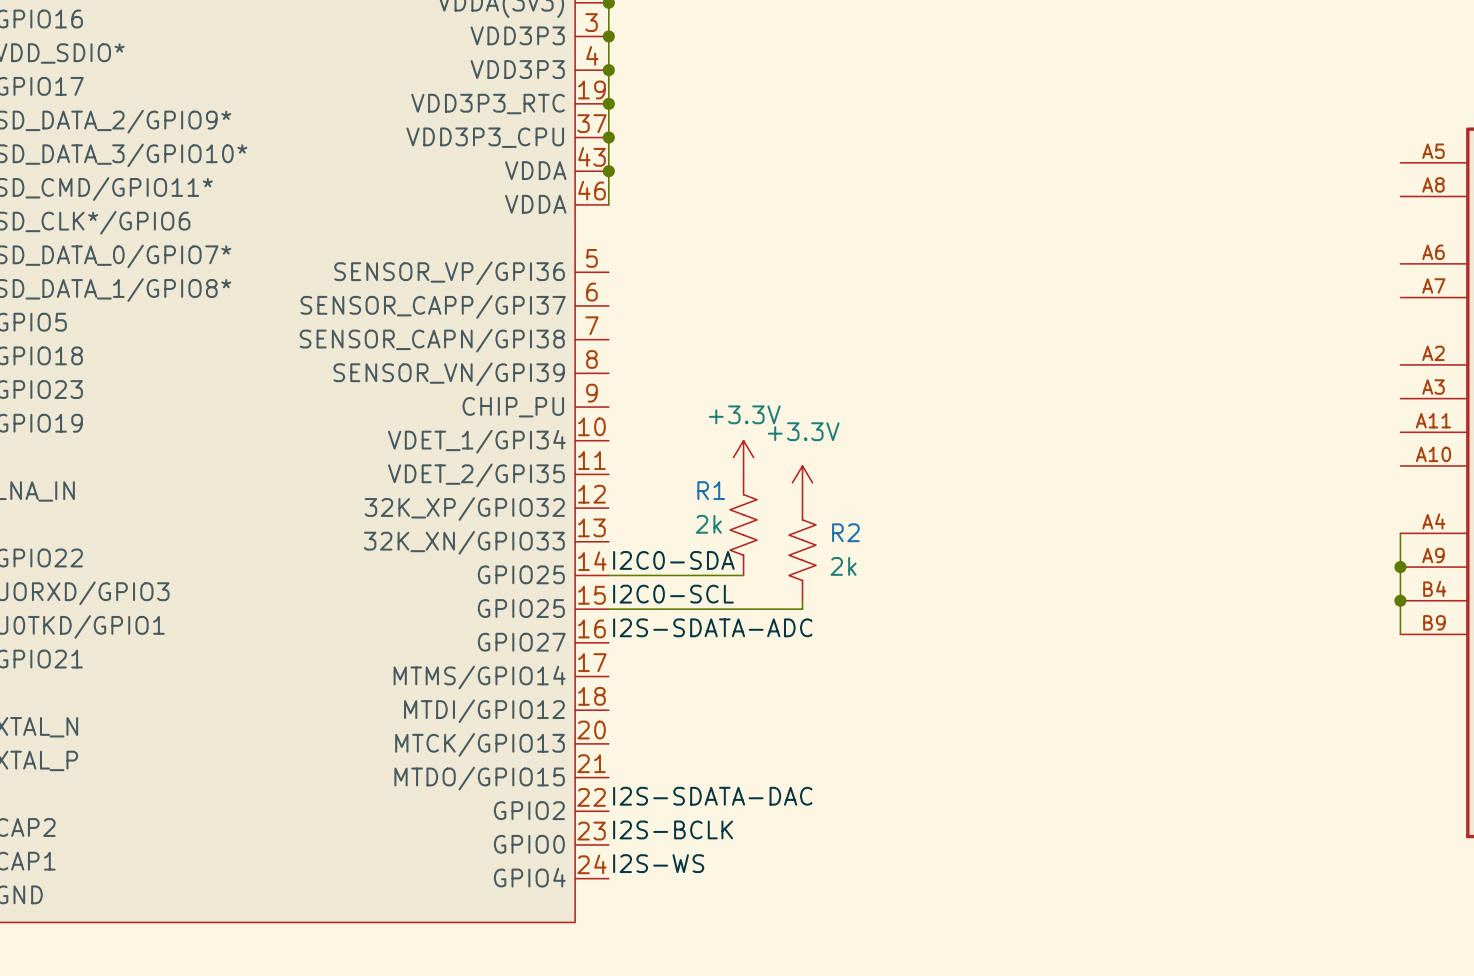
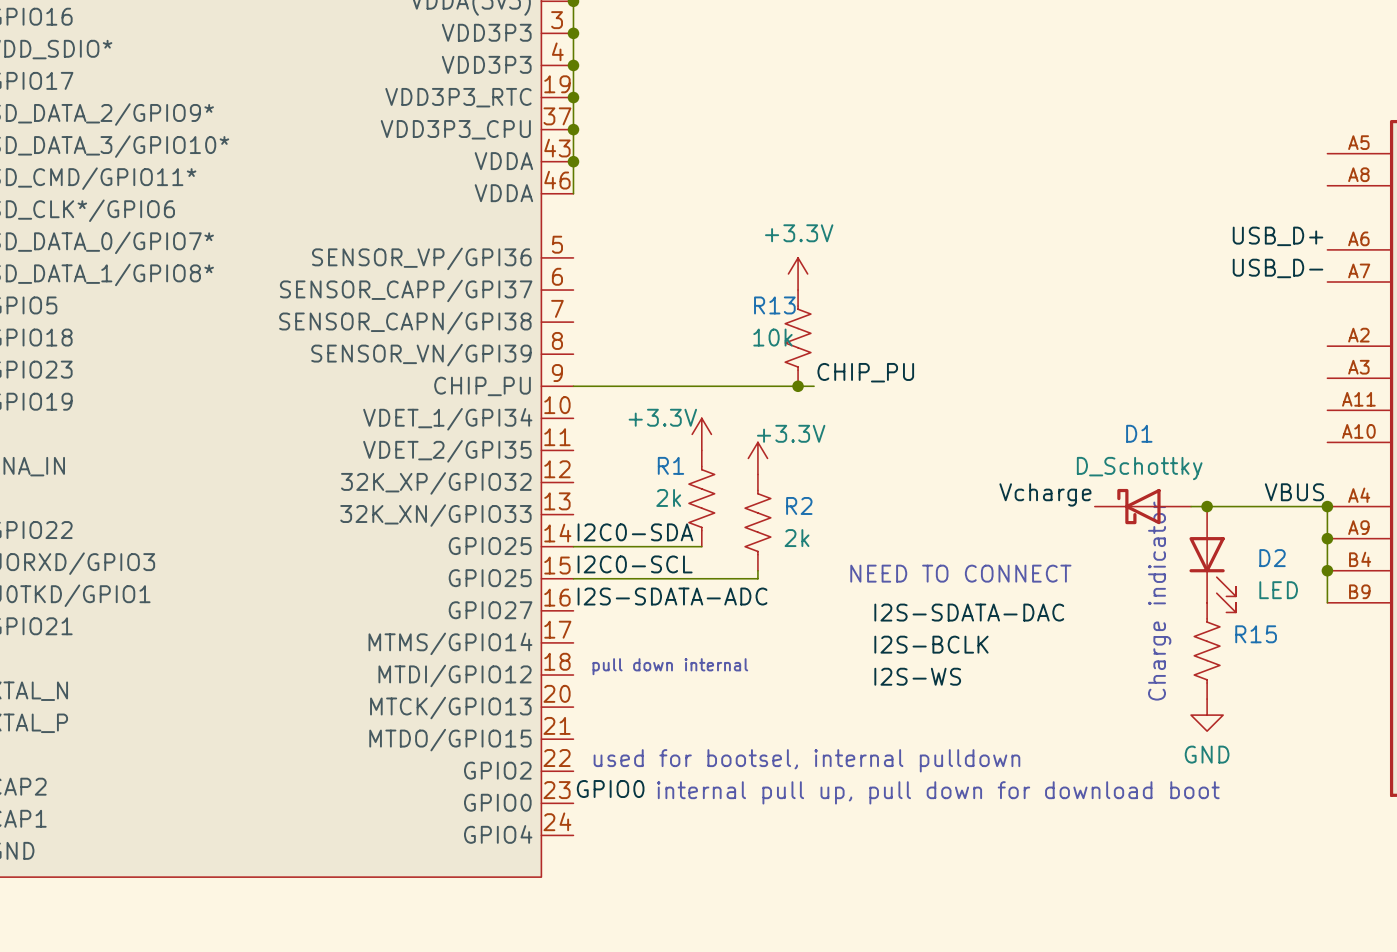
label: none -> USB_D+ (1278, 236)
label: none -> USB_D- (1278, 268)
power symbol: none -> +3.3V (798, 273)
R13: none -> 10k (798, 338)
label: none -> CHIP_PU (865, 372)
wire: none -> (573, 386) (814, 386)
junction: none -> (798, 386)
power symbol text position: +3.3V (744, 414) -> +3.3V (662, 417)
power symbol text position: +3.3V (803, 431) -> +3.3V (791, 433)
label: none -> VBUS (1294, 492)
label: none -> Vcharge (1045, 494)
D1: none -> D_Schottky (1142, 506)
wire: none -> (1191, 506) (1327, 506)
junction: none -> (1207, 506)
junction: none -> (1327, 506)
D2: none -> LED (1212, 559)
text: none -> NEED TO CONNECT (960, 573)
text: none -> Charge indicator (1159, 601)
label: none -> I2S-SDATA-DAC (969, 612)
label: none -> I2S-BCLK (931, 644)
R15: none -> (1207, 650)
text: none -> pull down internal (670, 666)
label: none -> I2S-WS (917, 676)
power symbol: none -> GND (1207, 715)
label: I2S-SDATA-DAC (712, 796) -> none
text: none -> used for bootsel, internal pulldown (806, 760)
label: I2S-BCLK (673, 829) -> GPIO0 (610, 789)
text: none -> internal pull up, pull down for download boot (938, 792)
label: I2S-WS (658, 863) -> none

